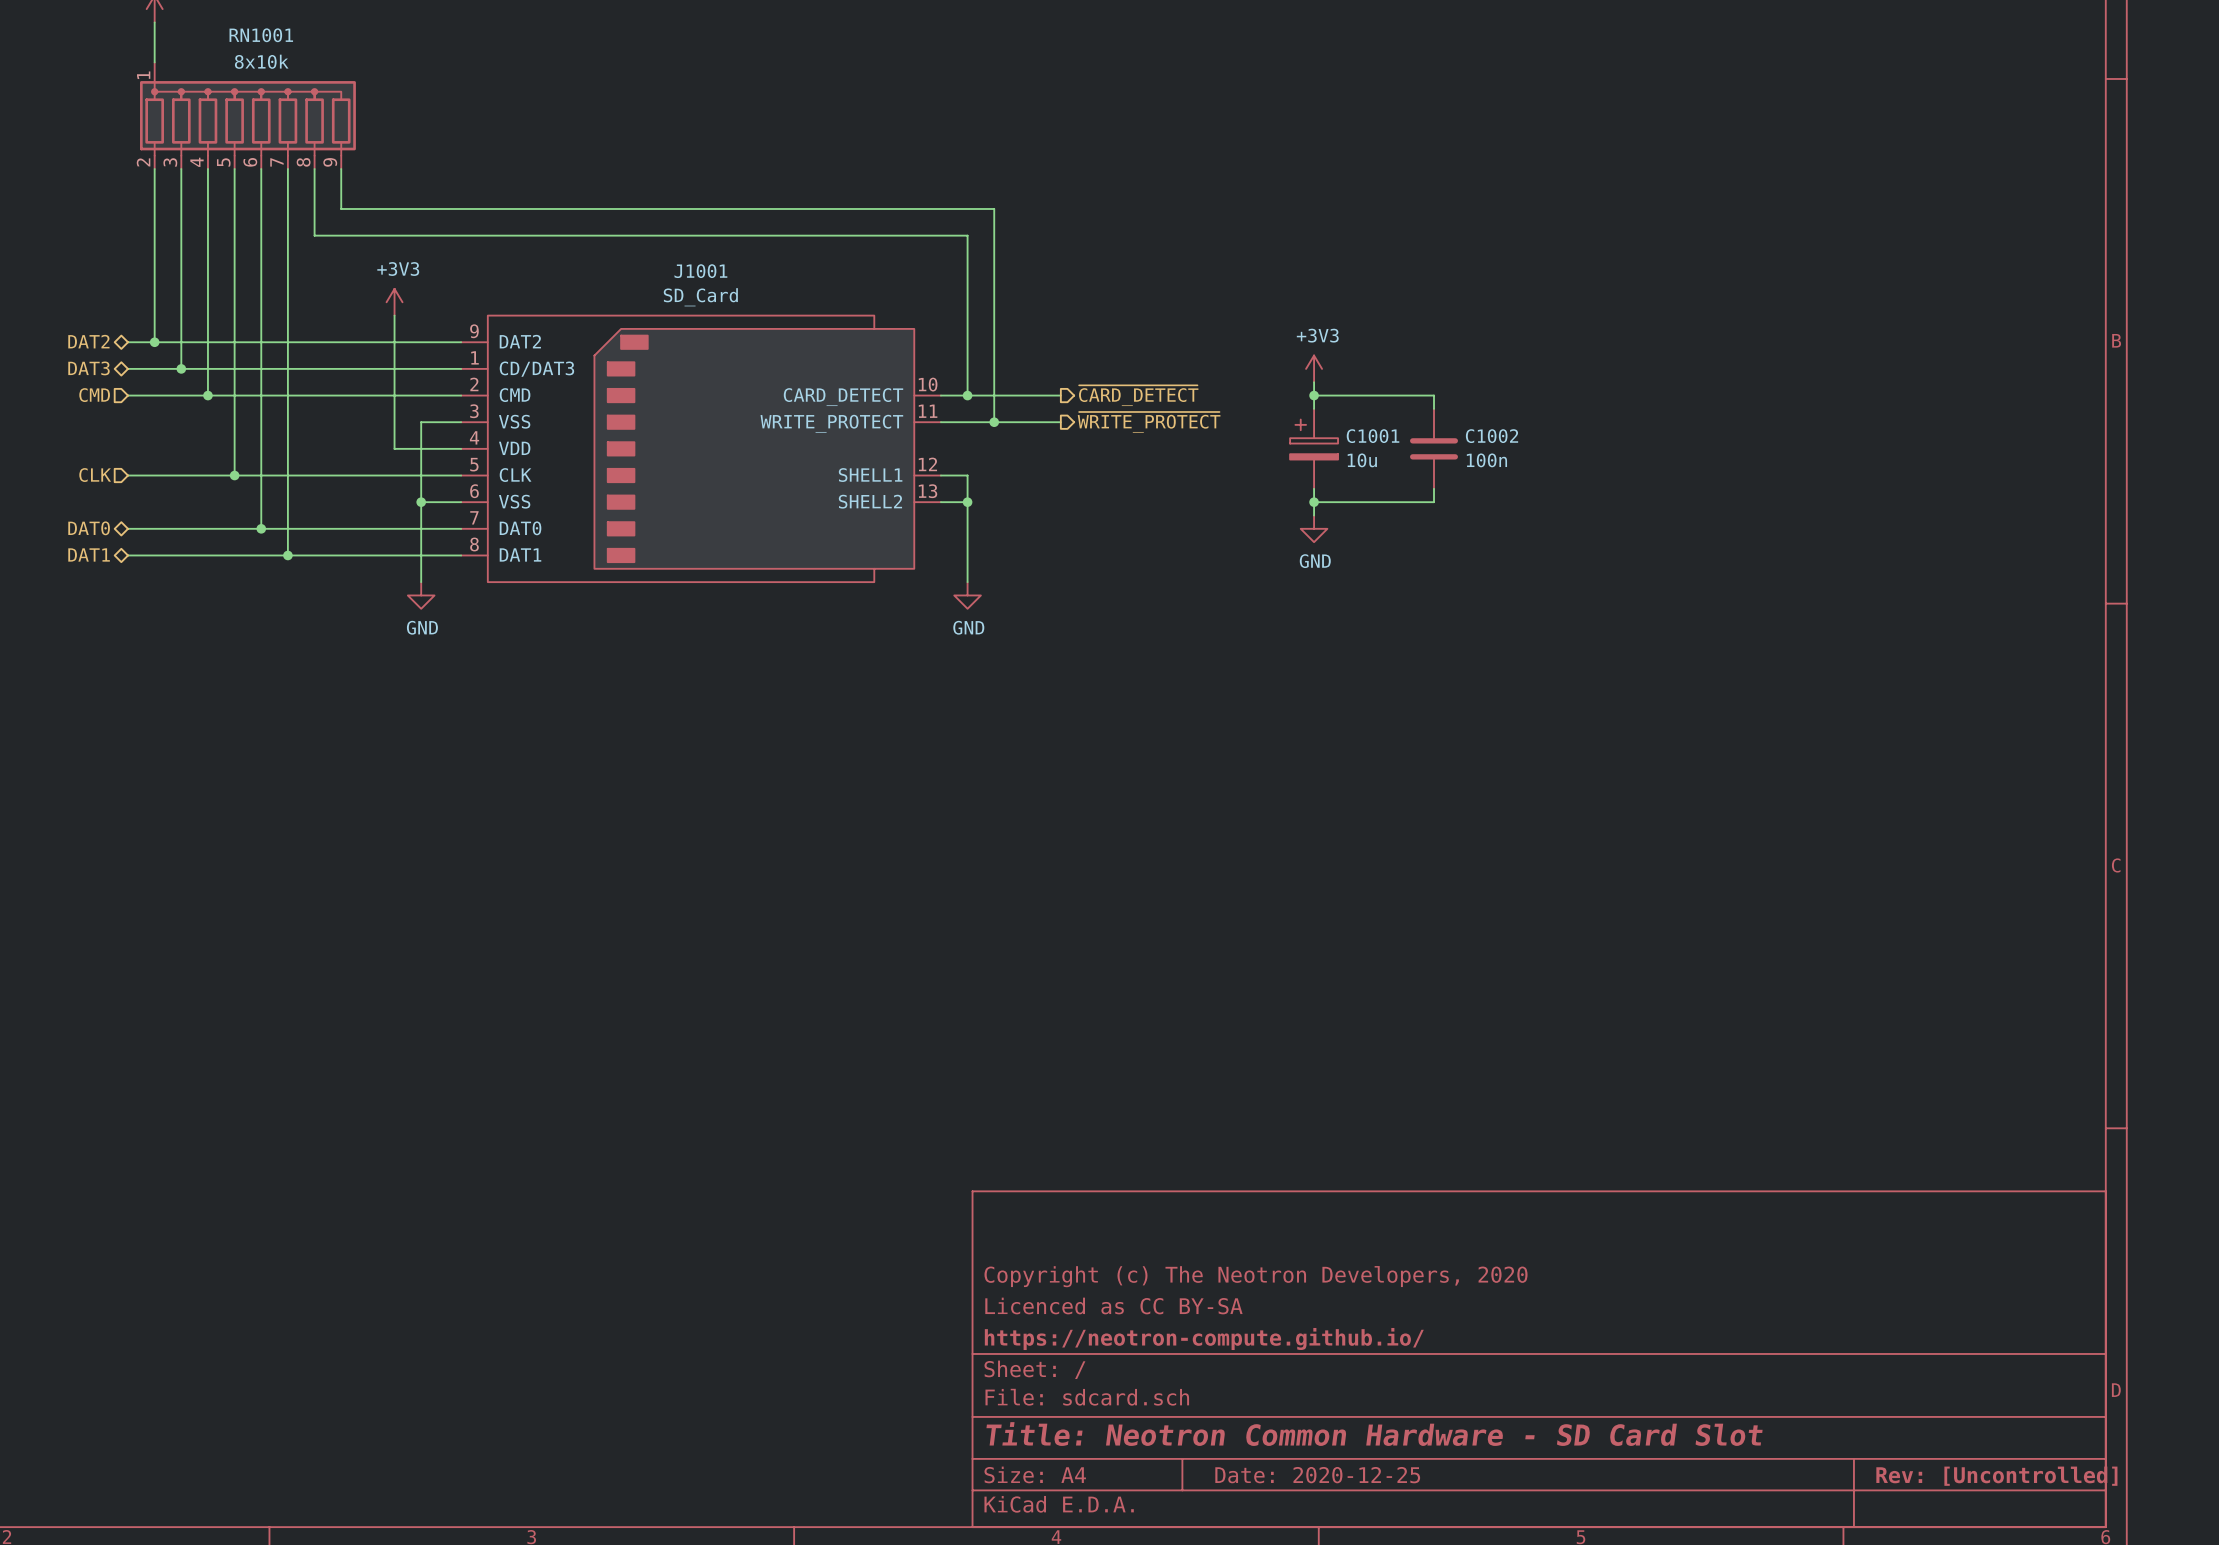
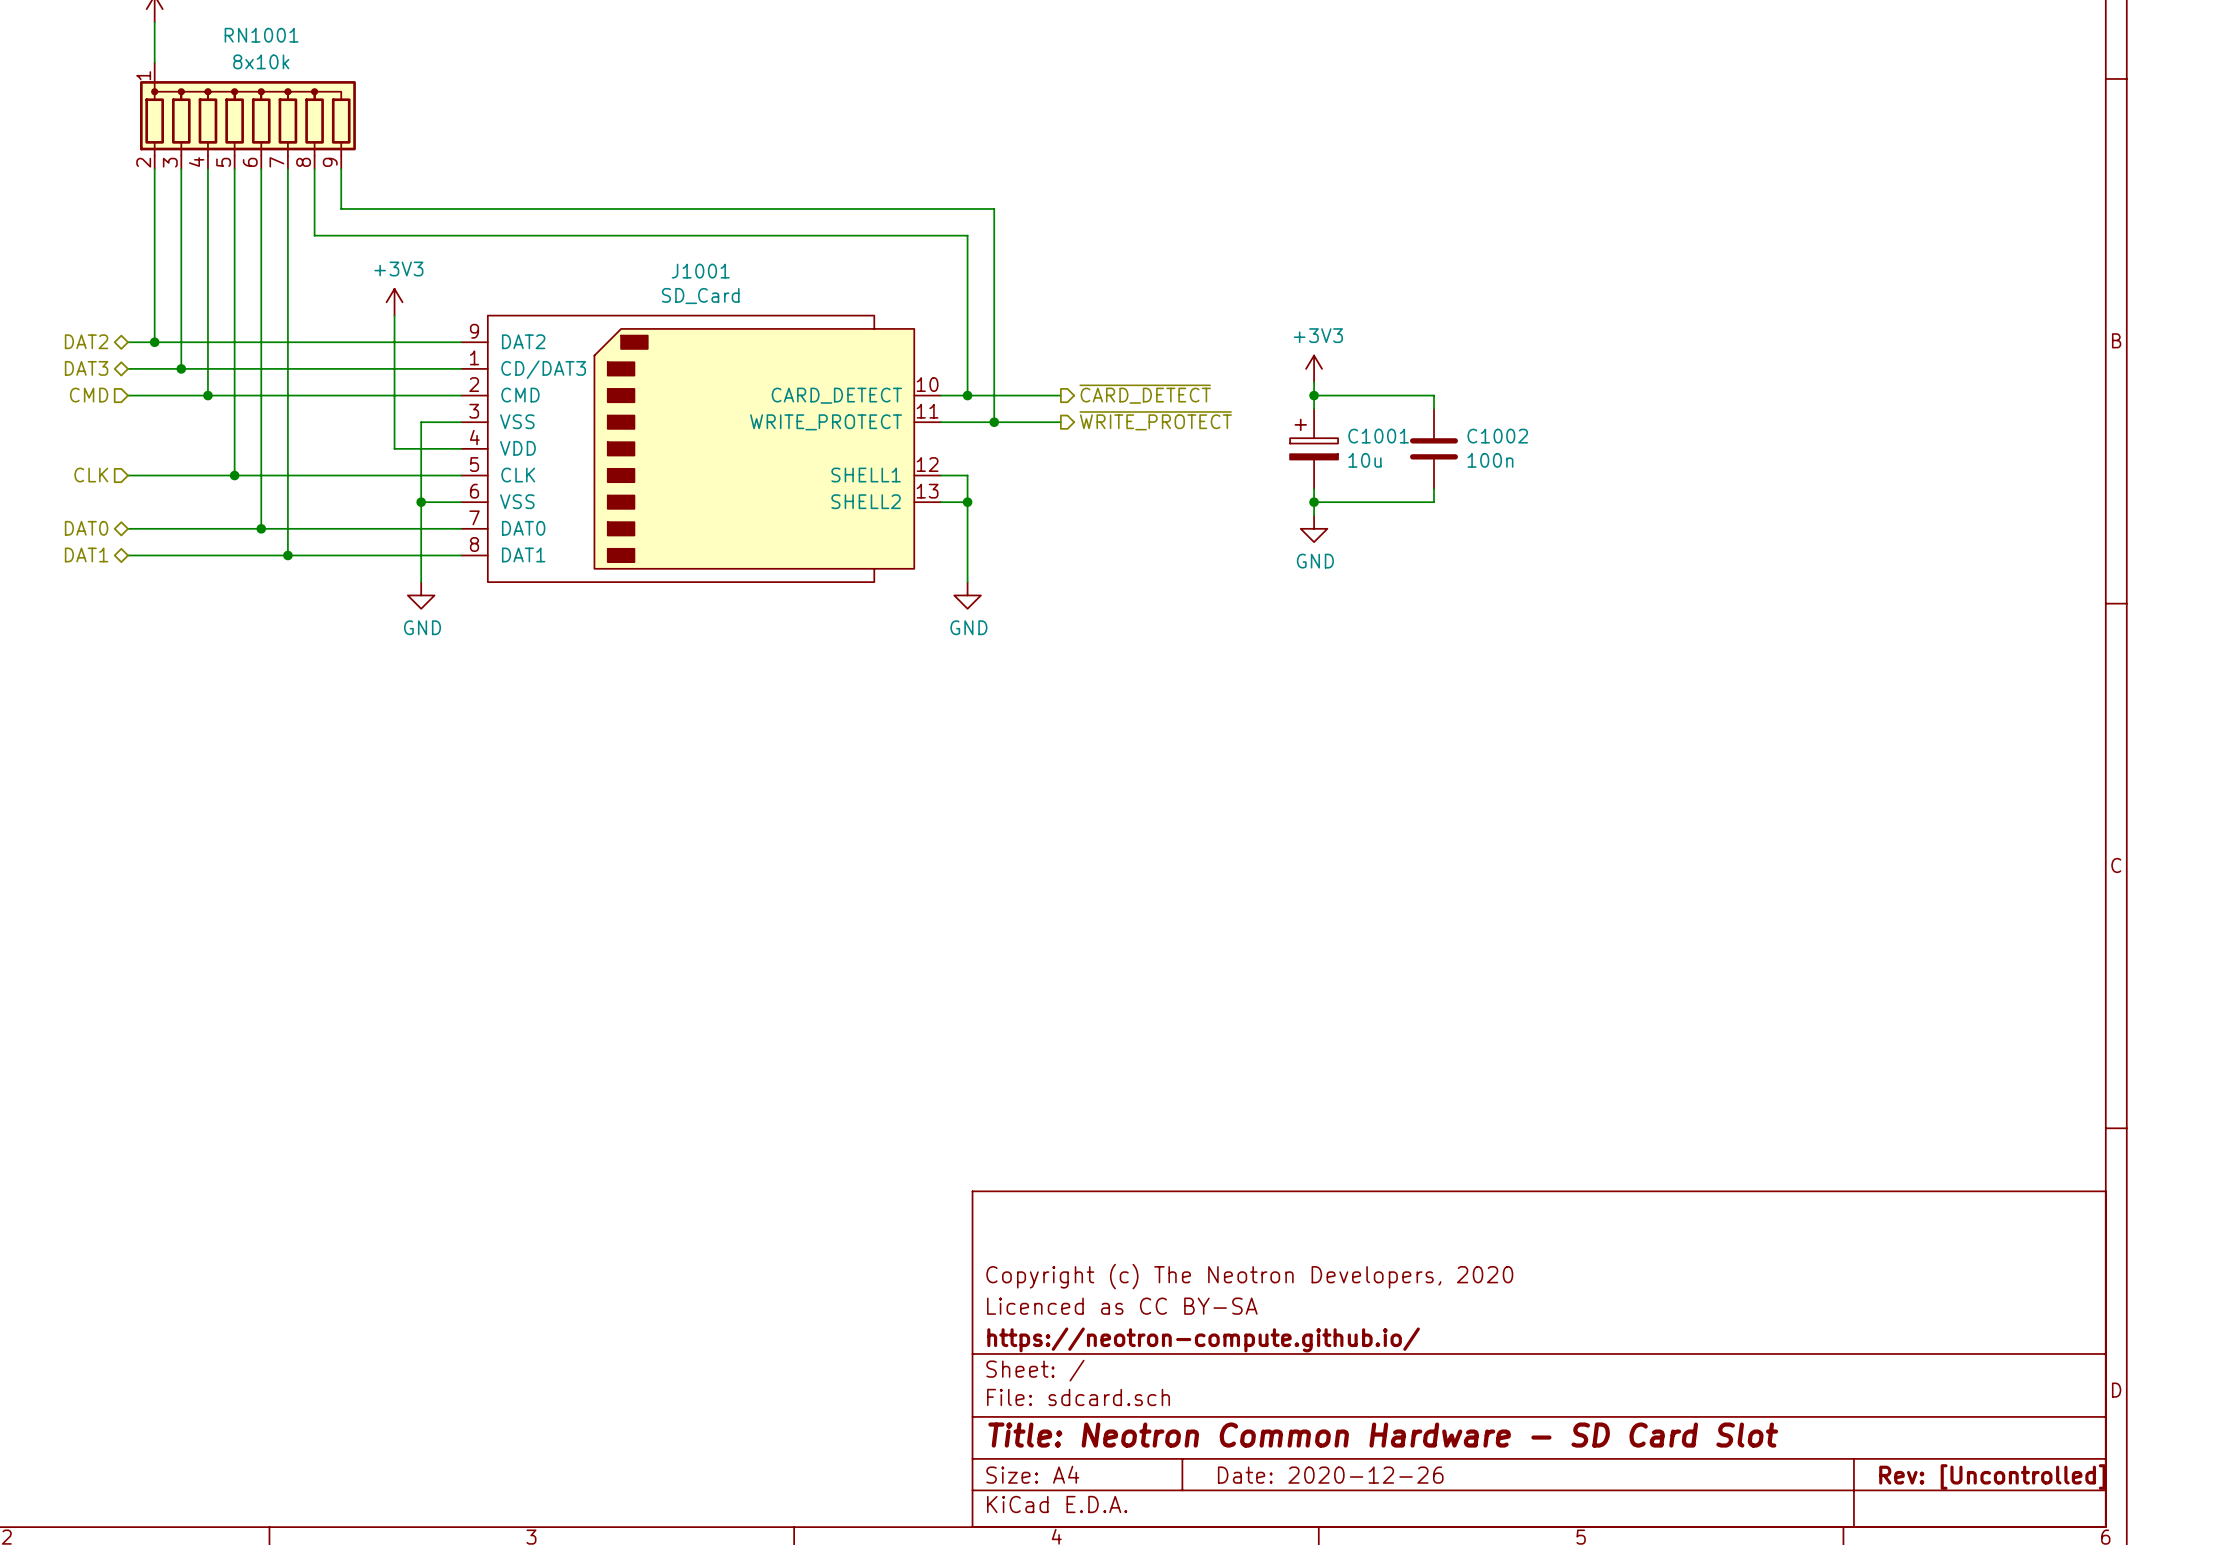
title block: Date: 2020-12-25 (1317, 1475) -> Date: 2020-12-26 (1330, 1475)

